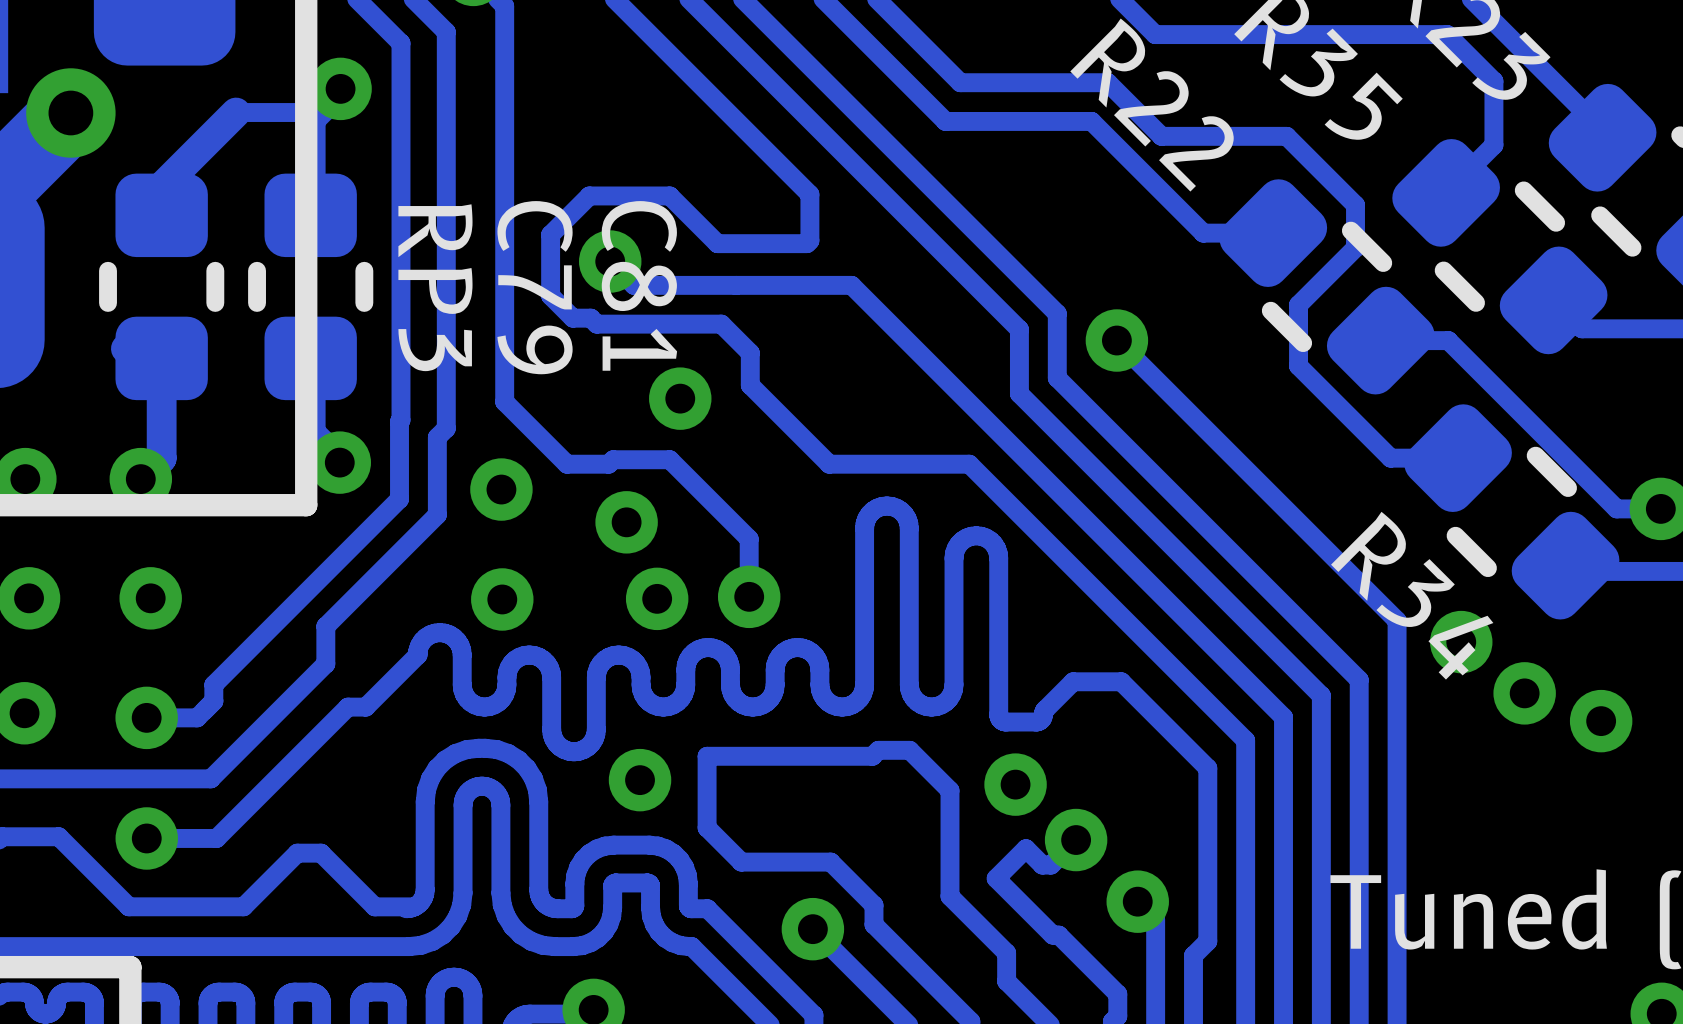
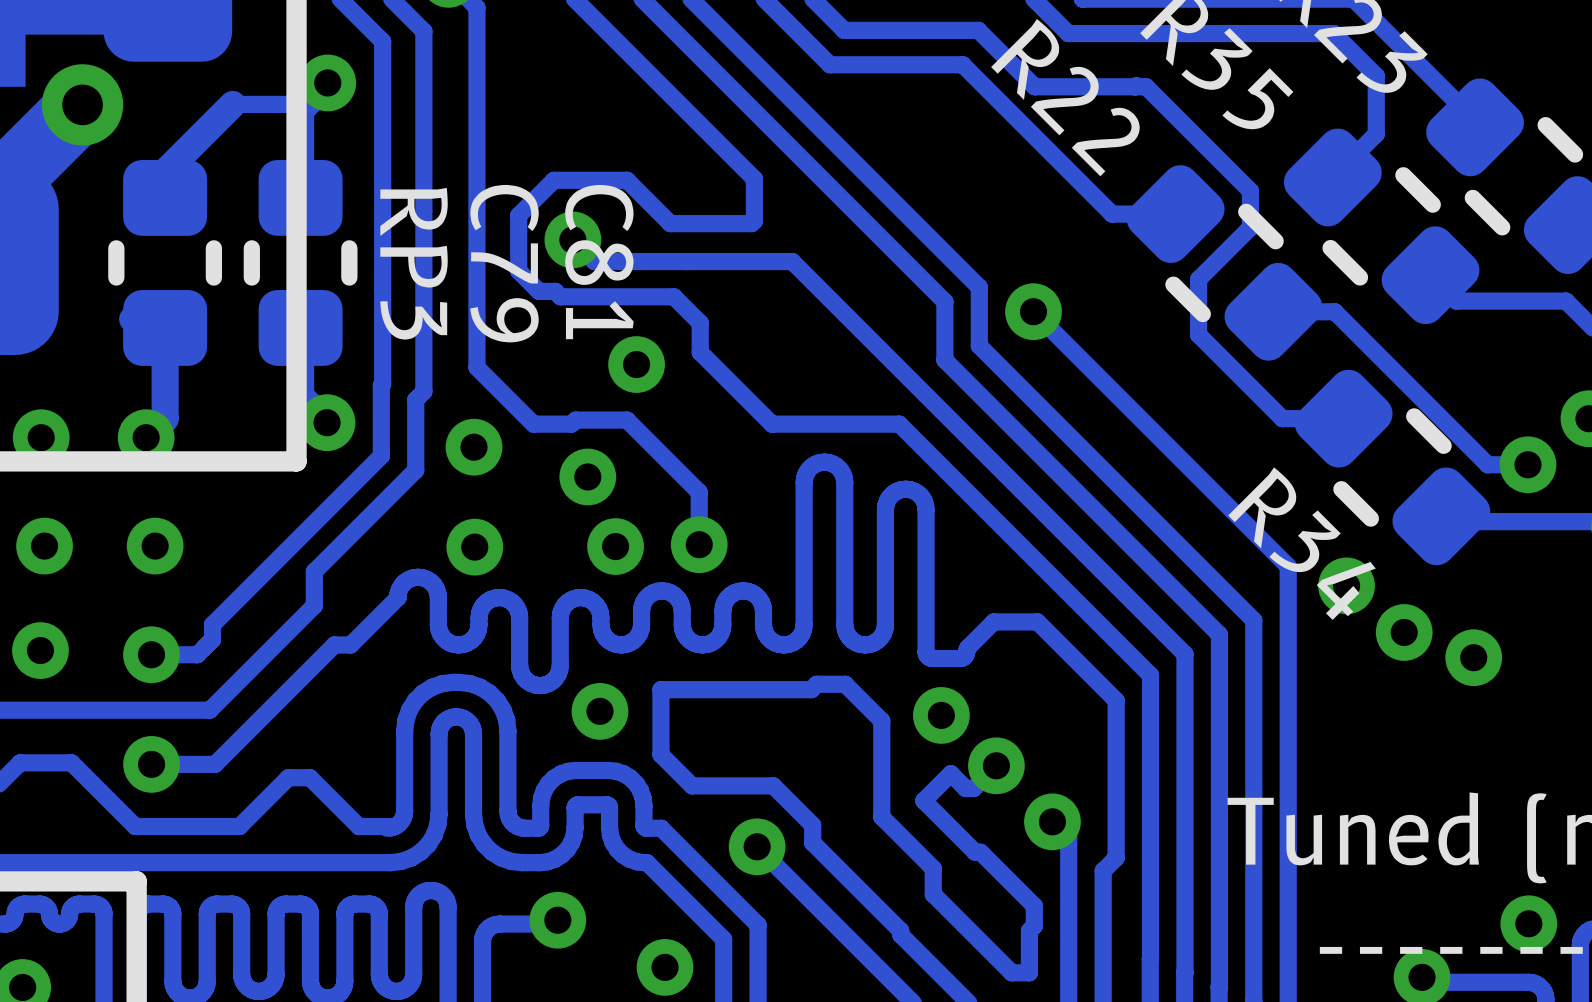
track: (908, 31) (960, 82) (1107, 82) -> (844, 30) (978, 30) (1025, 77)
track: (893, 68) (945, 121) (1091, 121) -> (830, 64) (962, 64) (1010, 112)
track: (1118, 93) (1161, 136) (1286, 136) (1355, 205) -> (1034, 86) (1146, 86) (1250, 191)

